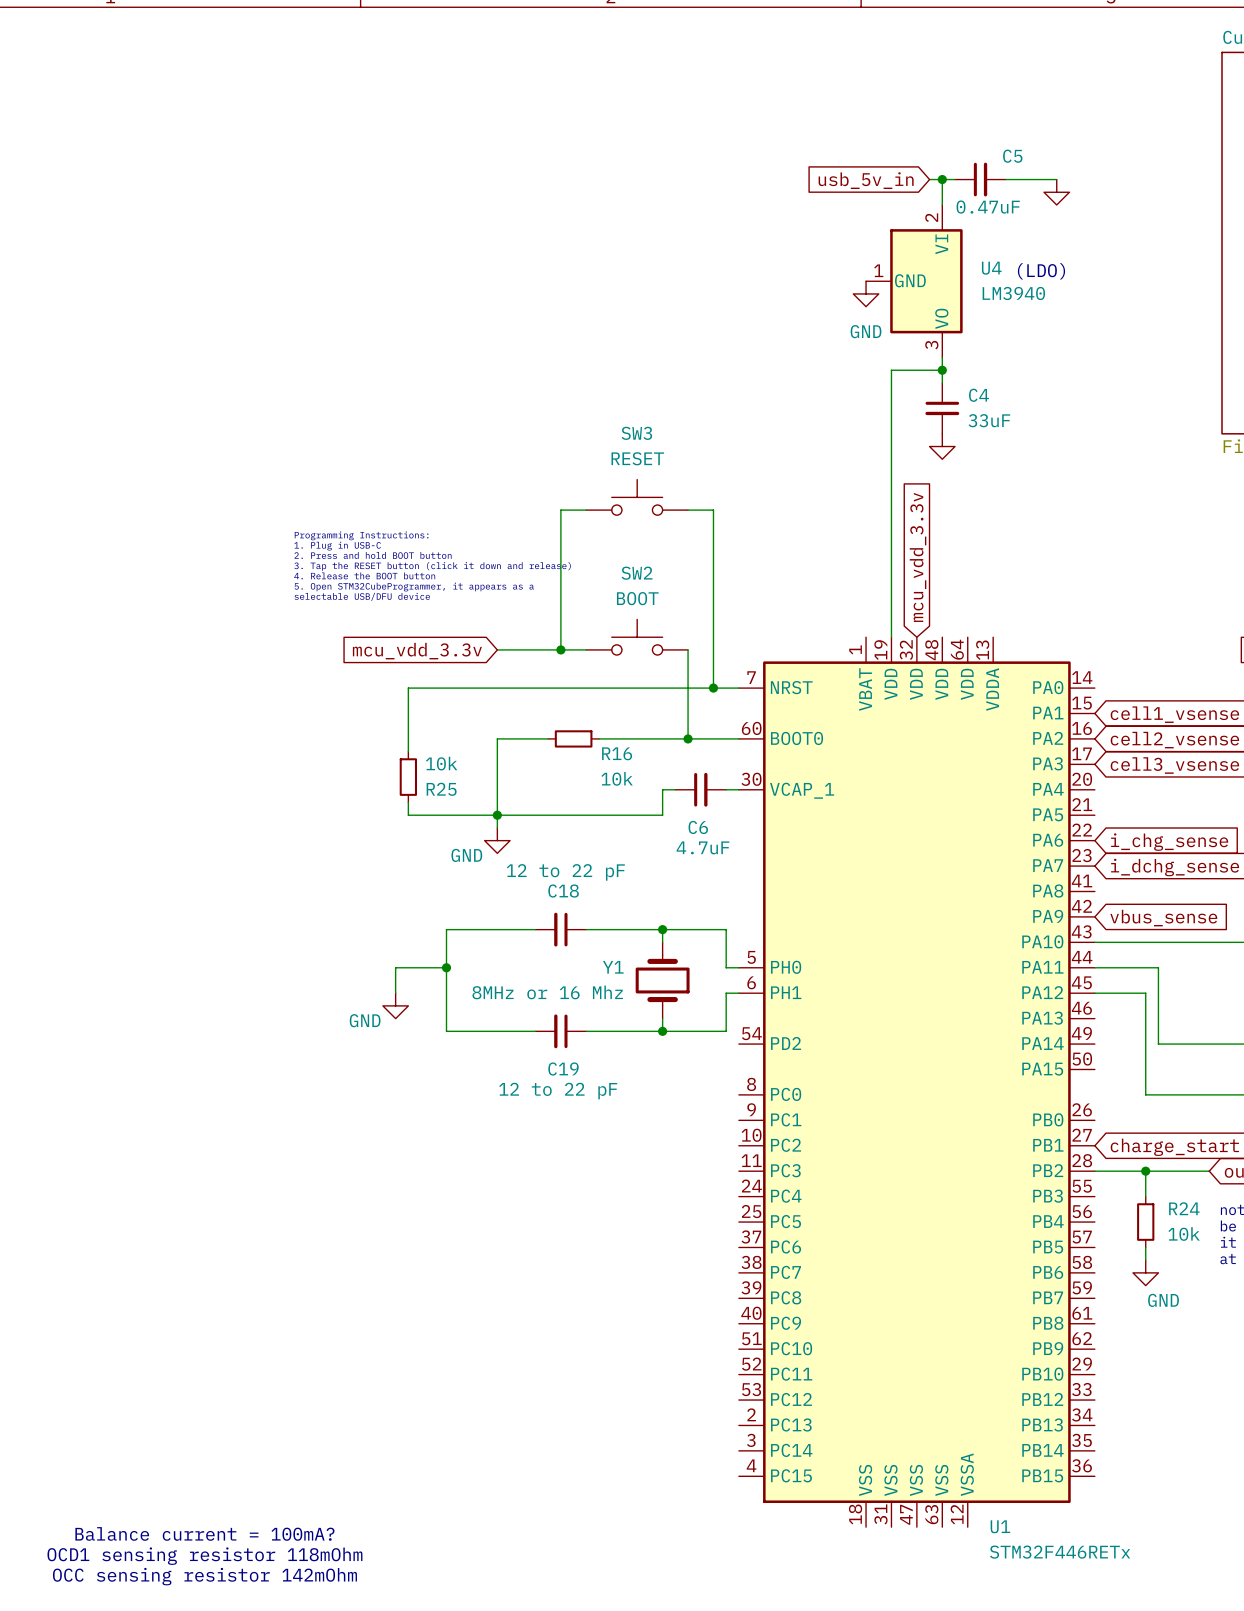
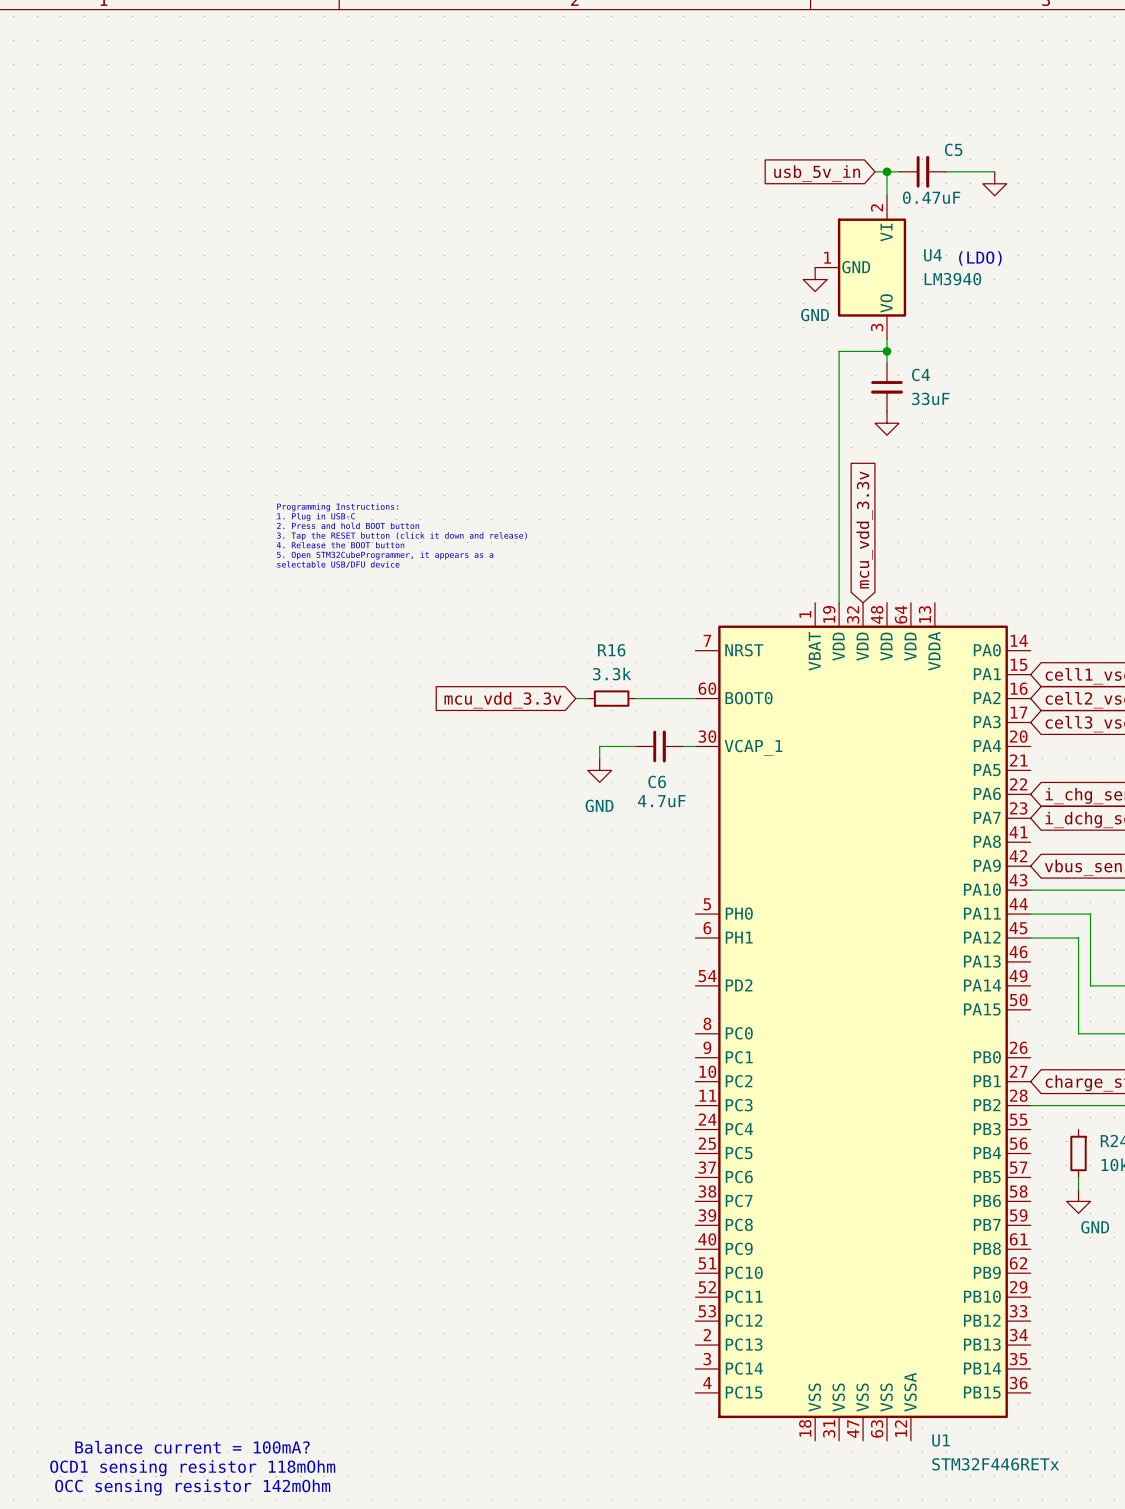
SW3: RESET (637, 497) -> none
wire: (586, 510) (560, 510) (560, 649) -> none
wire: (688, 510) (713, 510) (713, 688) -> none
SW2: BOOT (637, 637) -> none
wire: (497, 649) (586, 649) -> none
junction: (560, 649) -> none
wire: (688, 649) (688, 738) -> none
global label position: mcu_vdd_3.3v (417, 651) -> mcu_vdd_3.3v (502, 700)
junction: (713, 688) -> none
wire: (738, 688) (408, 688) (408, 751) -> none
wire: (548, 738) (497, 738) (497, 827) -> none
R16 position: (573, 738) -> (611, 698)
wire: (599, 738) (611, 738) -> none
wire: (624, 738) (675, 738) -> none
junction: (688, 738) -> none
R16 name position: R16 (617, 753) -> R16 (611, 650)
R25: 10k (408, 777) -> none
R16 value: 10k (617, 778) -> 3.3k (612, 674)
wire: (662, 789) (662, 815) (408, 815) (408, 802) -> (623, 746) (599, 746) (599, 758)
junction: (497, 815) -> none
power symbol position: GND (497, 840) -> GND (599, 770)
power symbol text position: GND (466, 855) -> GND (599, 805)
wire: (535, 929) (446, 929) (446, 1031) (535, 1031) -> none
C18: 12 to 22 pF (560, 929) -> none
wire: (586, 929) (726, 929) (726, 967) (738, 967) -> none
wire: (662, 929) (662, 942) -> none
junction: (662, 929) -> none
wire: (446, 967) (395, 967) (395, 993) -> none
junction: (446, 967) -> none
Y1: 8MHz or 16 Mhz (662, 980) -> none
wire: (738, 993) (726, 993) (726, 1031) (586, 1031) -> none
power symbol: GND (395, 1005) -> none
wire: (662, 1018) (662, 1031) -> none
C19: 12 to 22 pF (560, 1031) -> none
junction: (662, 1031) -> none
wire: (1145, 1171) (1145, 1196) -> none
junction: (1145, 1171) -> none

